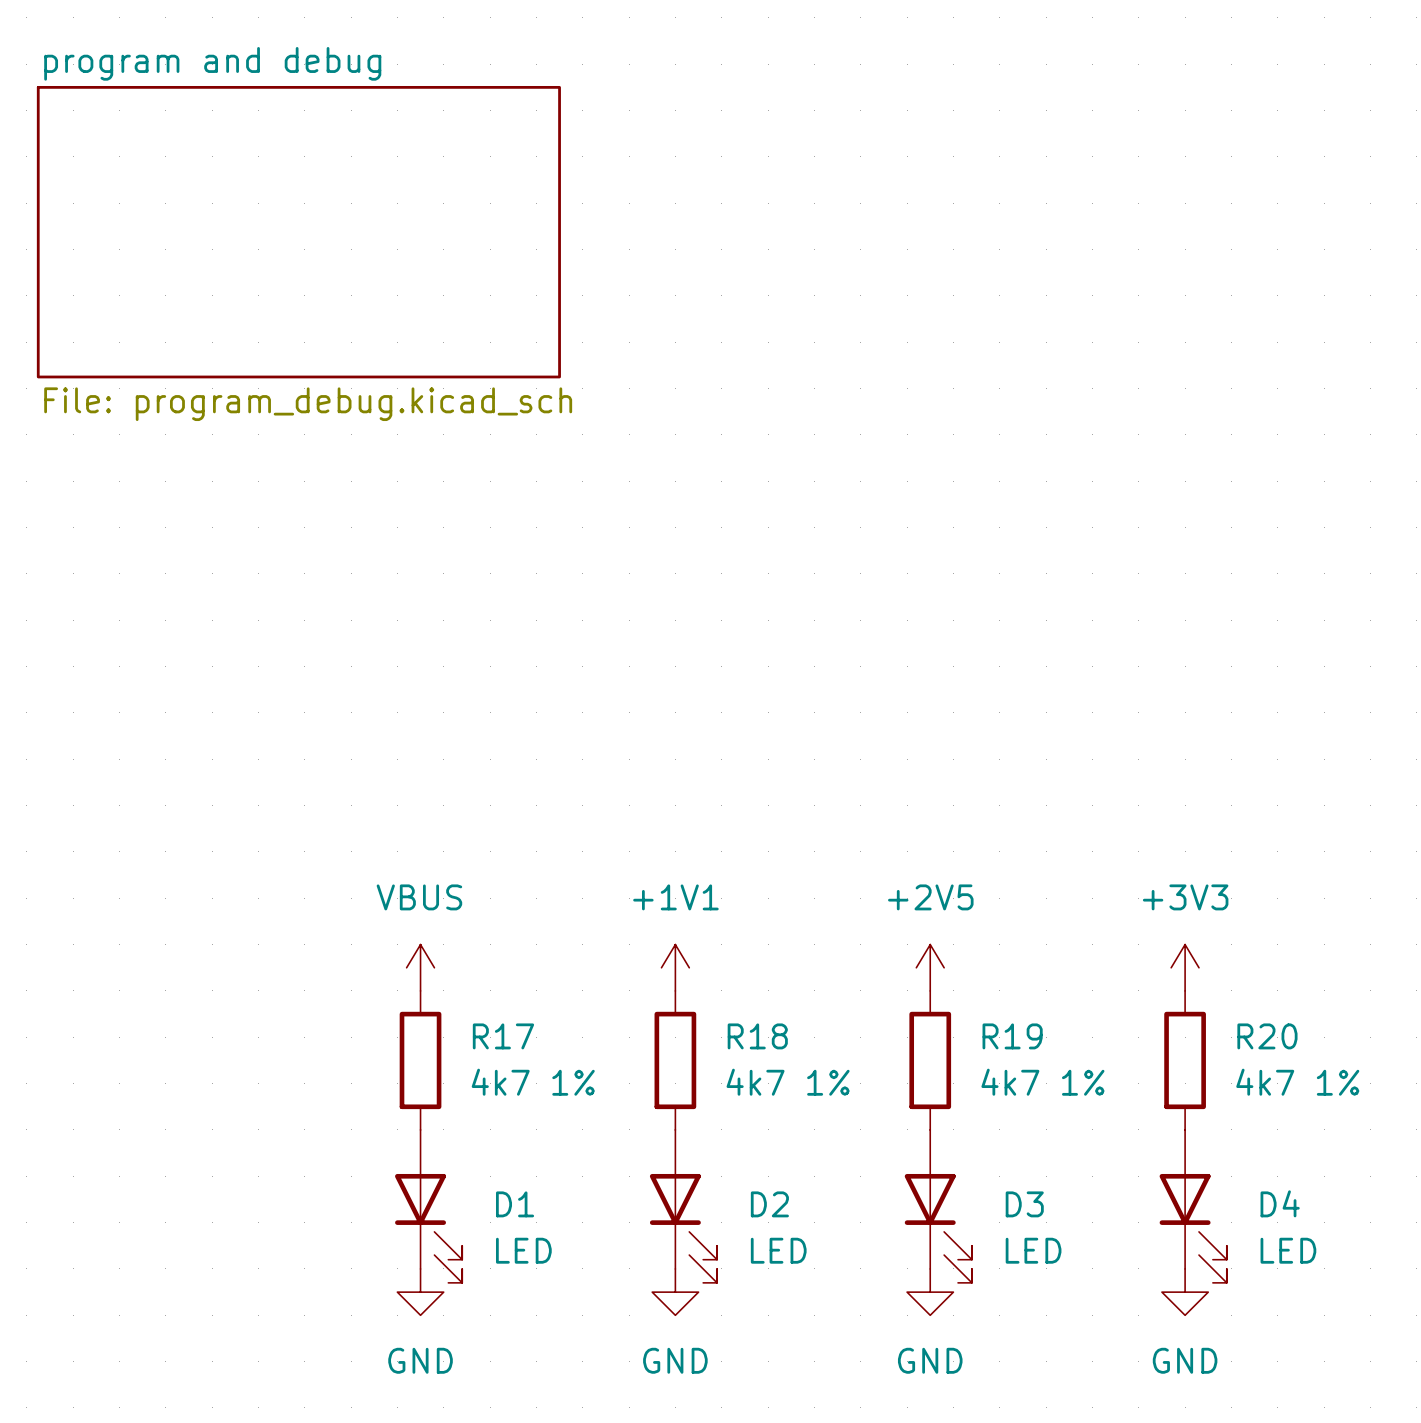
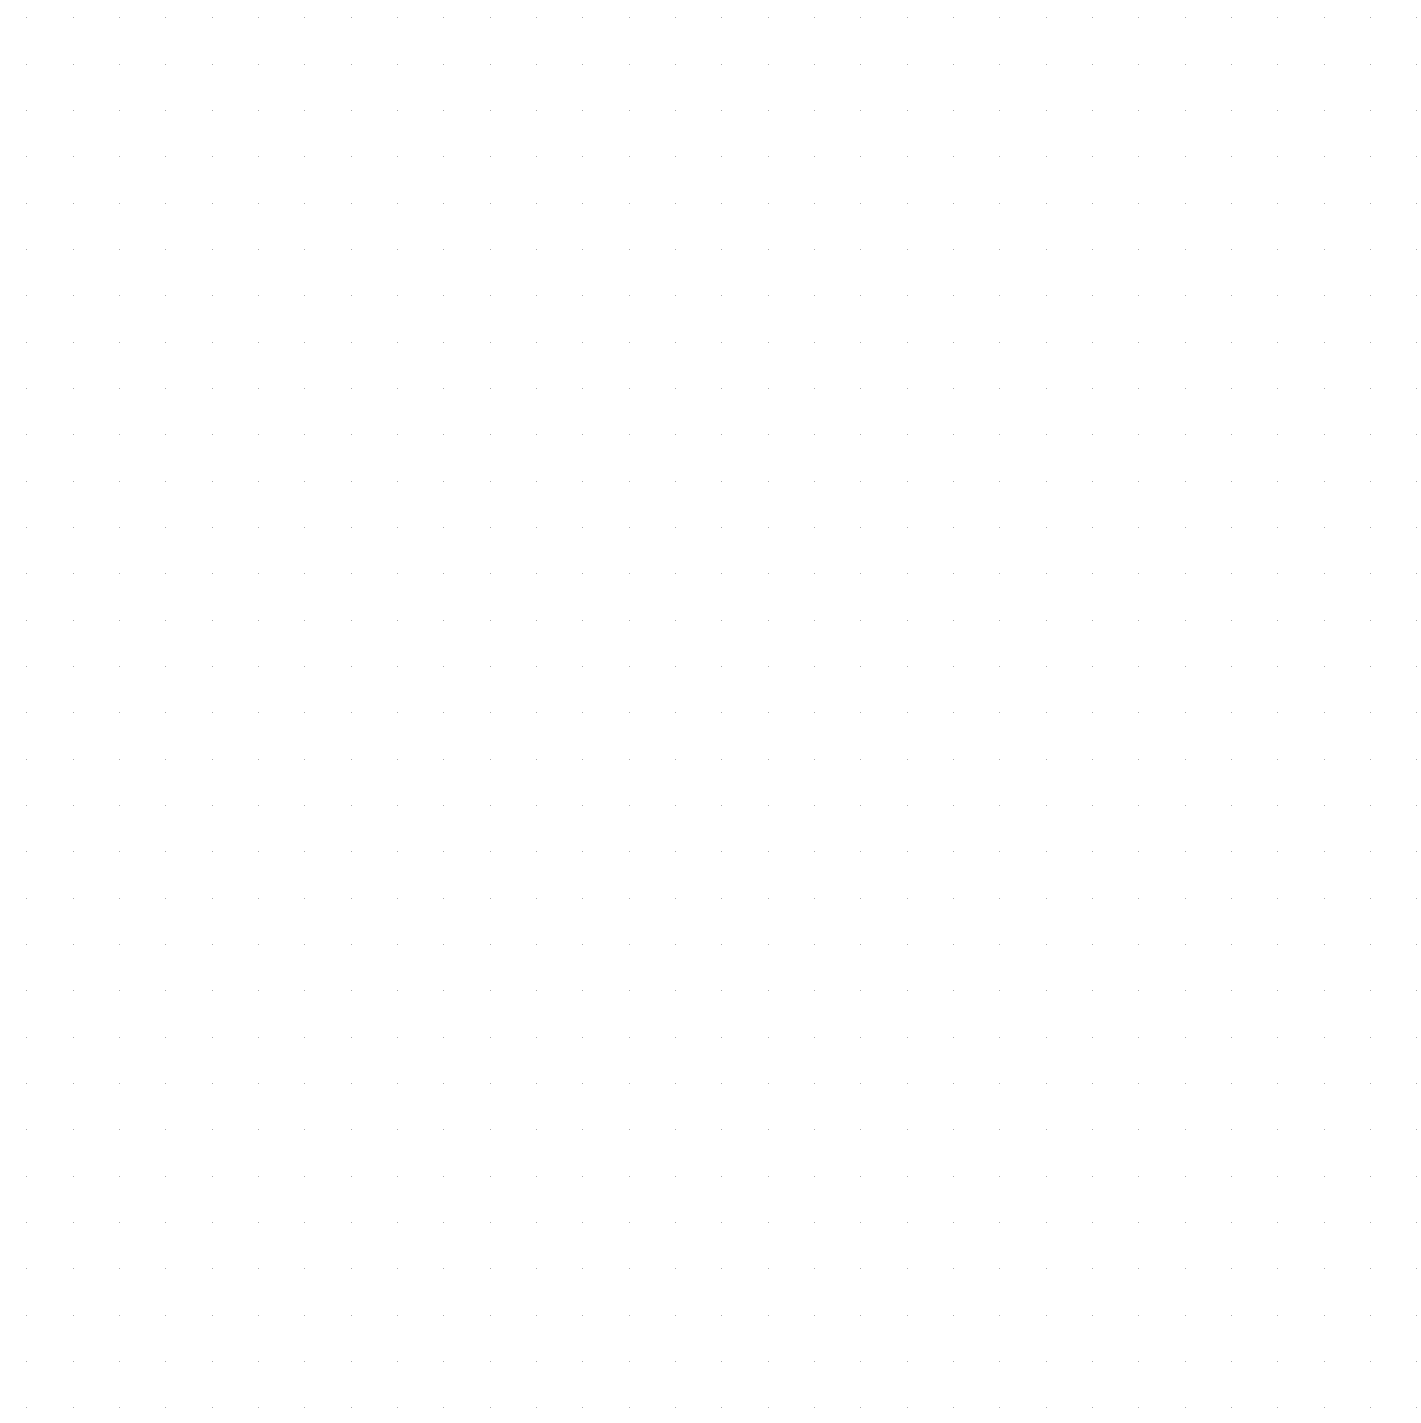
sheet program and debug: File: program_debug.kicad_sch (298, 232) -> none
power symbol: VBUS (420, 967) -> none
power symbol: +1V1 (675, 967) -> none
power symbol: +2V5 (930, 967) -> none
power symbol: +3V3 (1185, 967) -> none
R17: 4k7 1% (420, 1060) -> none
R18: 4k7 1% (675, 1060) -> none
R19: 4k7 1% (930, 1060) -> none
R20: 4k7 1% (1185, 1060) -> none
D1: LED (428, 1206) -> none
D2: LED (683, 1206) -> none
D3: LED (938, 1206) -> none
D4: LED (1193, 1206) -> none
power symbol: GND (420, 1292) -> none
power symbol: GND (675, 1292) -> none
power symbol: GND (930, 1292) -> none
power symbol: GND (1185, 1292) -> none

